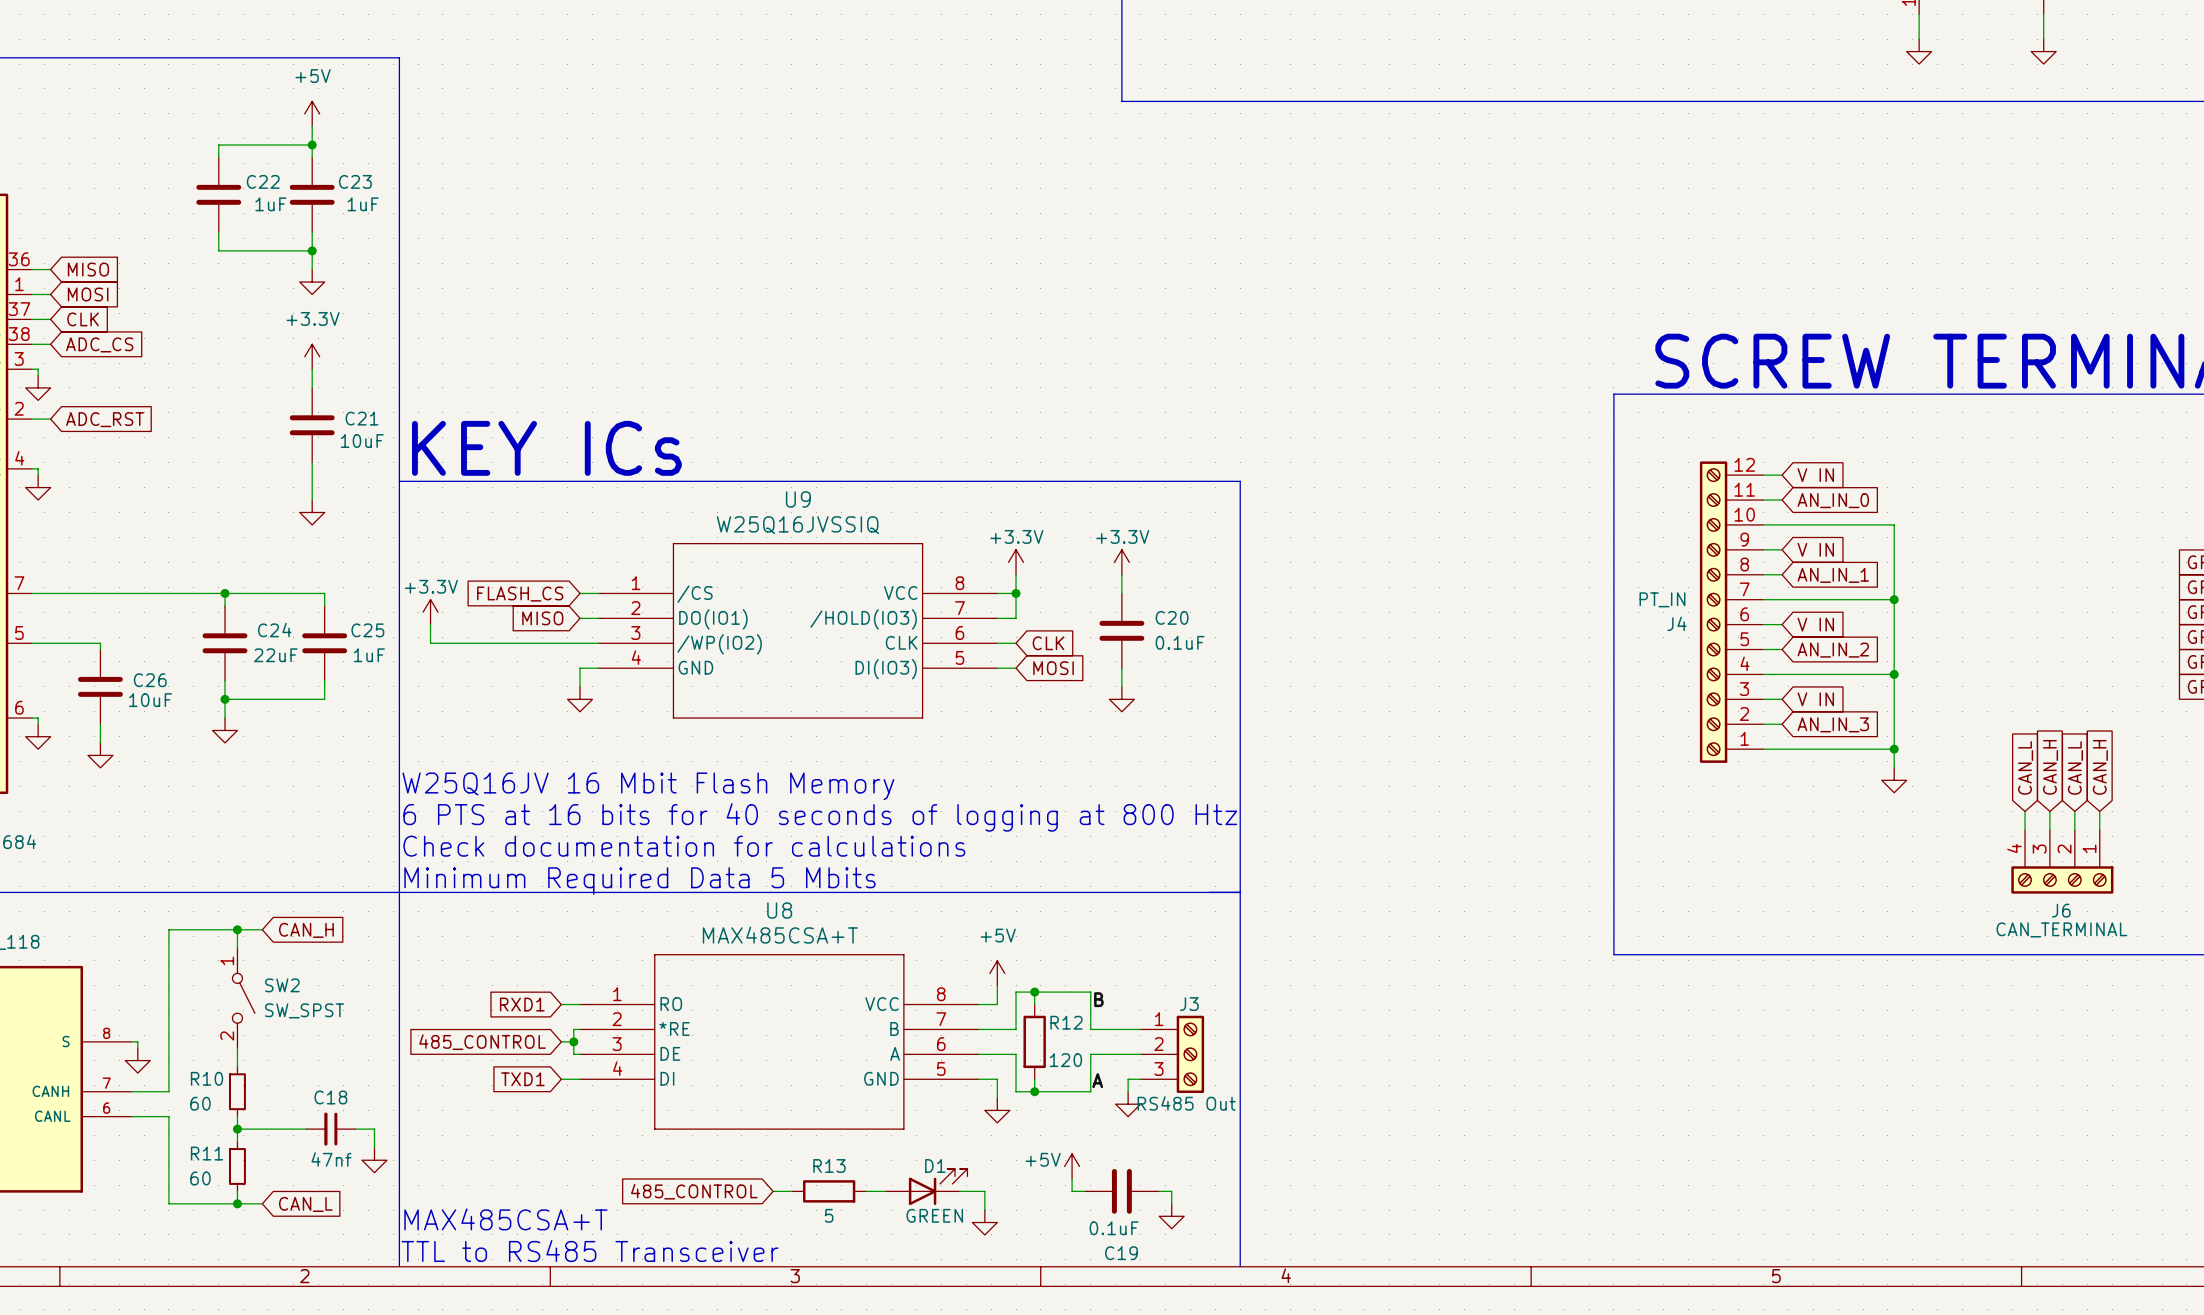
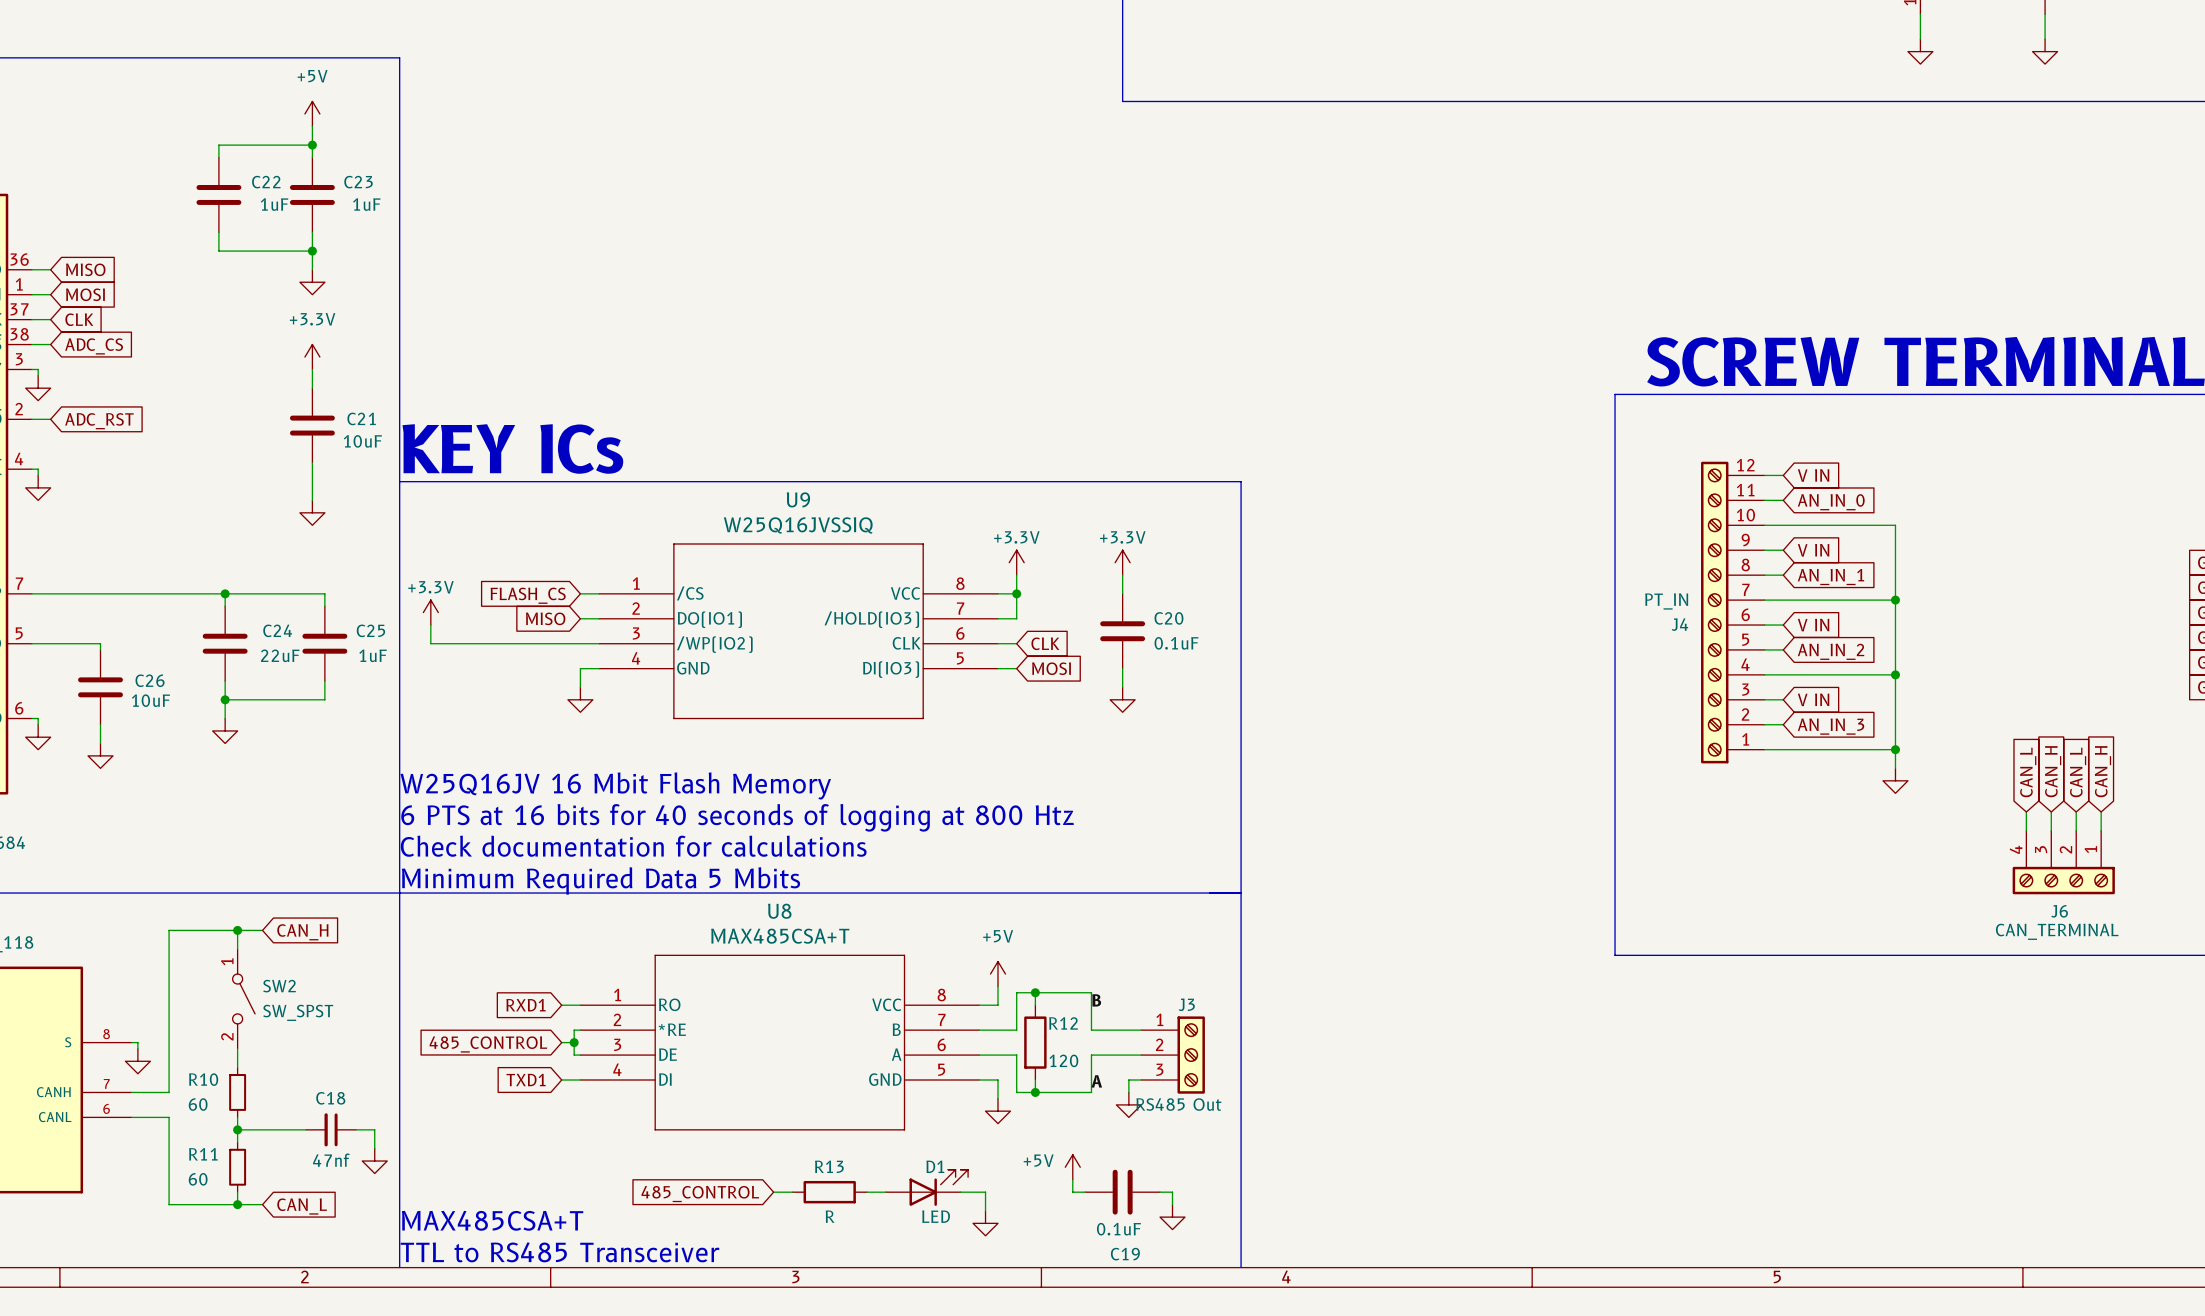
R13 value: 5 (829, 1215) -> R (830, 1216)
D1 value: GREEN (934, 1215) -> LED (936, 1216)

